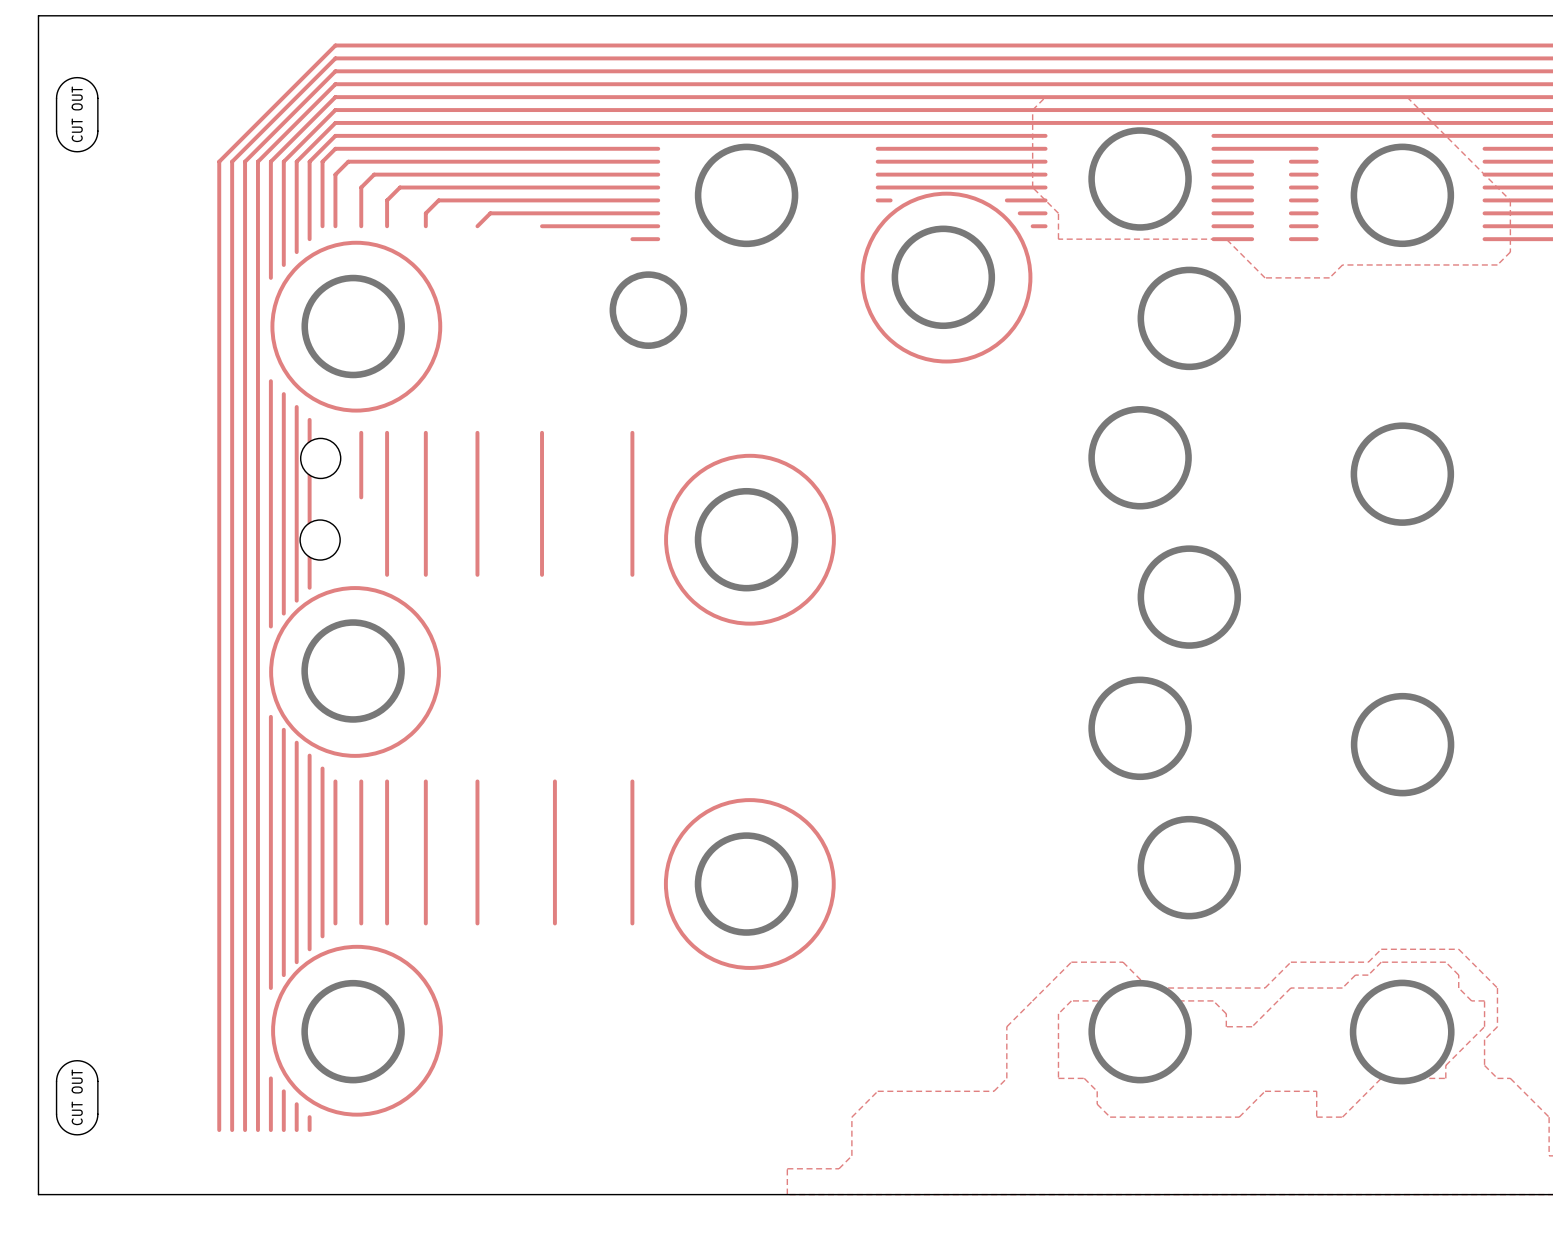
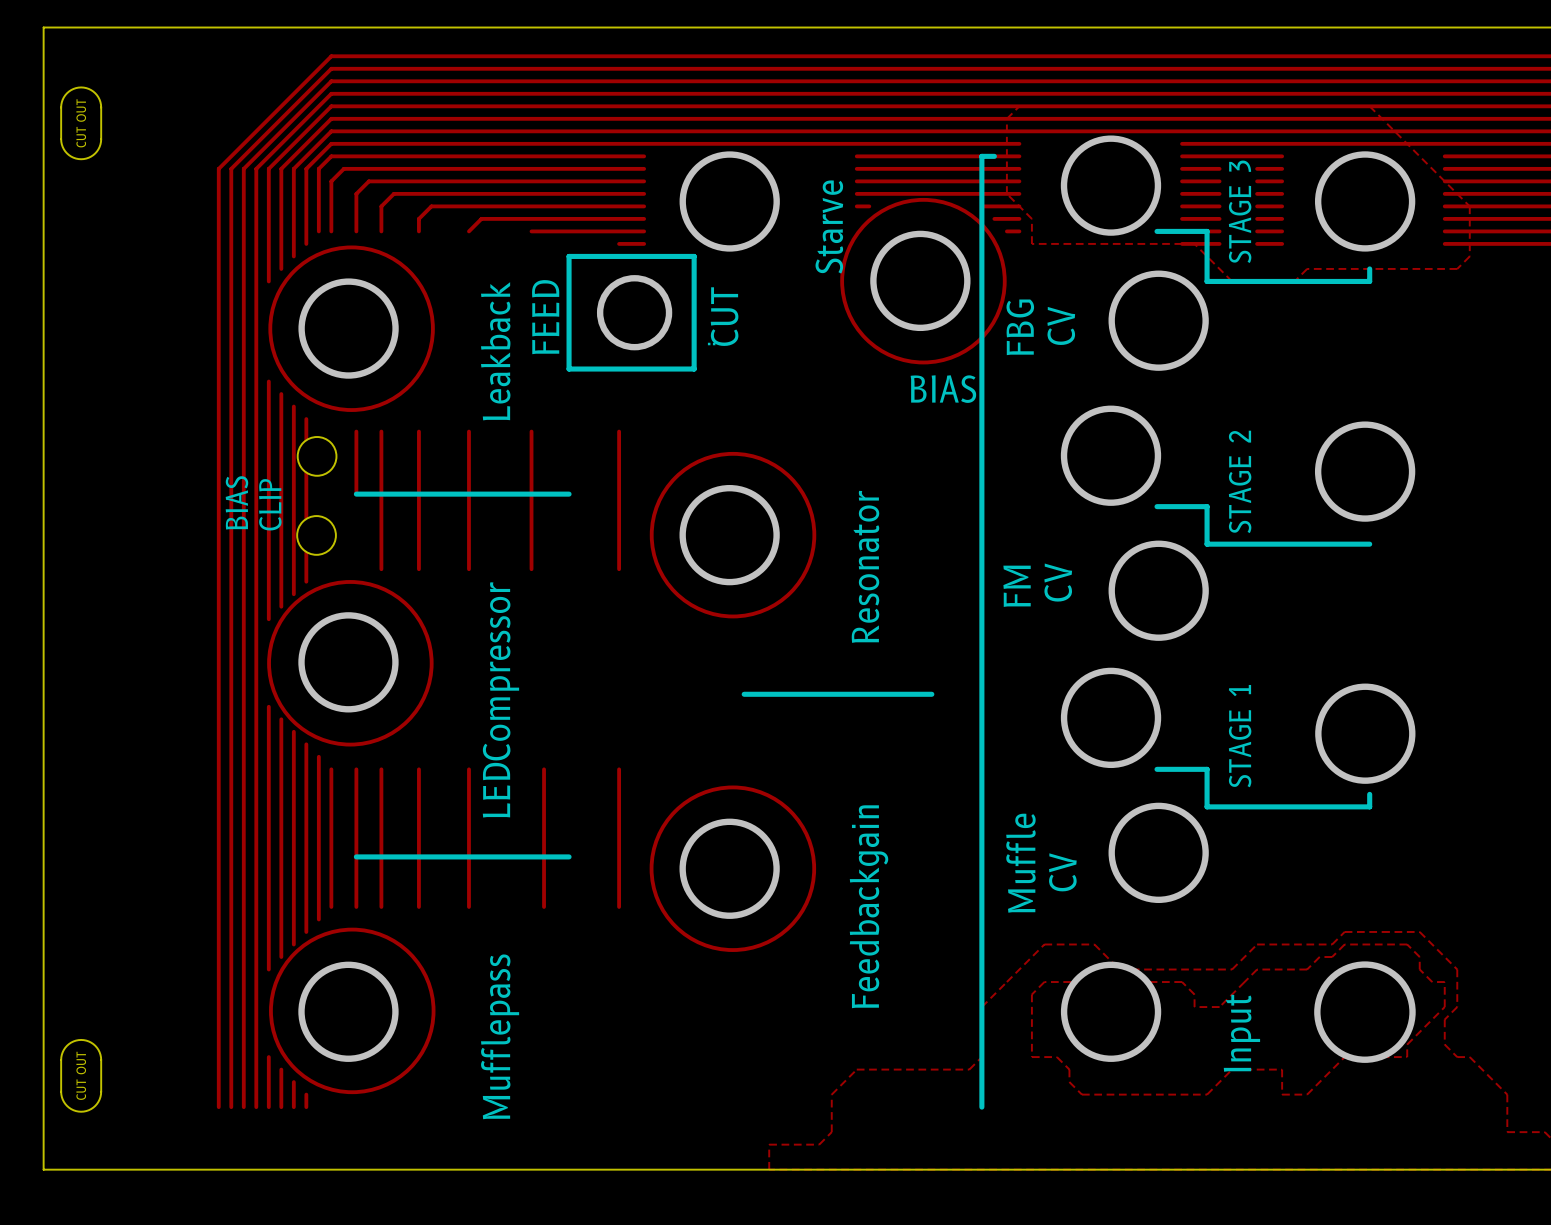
line: none -> (994, 156) (981, 156) (981, 1107)
text: none -> STAGE 3 (1240, 211)
text: none -> Starve (829, 227)
line: none -> (1157, 231) (1207, 231) (1207, 281) (1369, 281) (1369, 268)
line: none -> (569, 256) (569, 369) (694, 369) (694, 256) (569, 256)
text: none -> FEED (545, 317)
text: none -> CUT (724, 316)
text: none -> CV (1061, 325)
text: none -> FBG (1020, 327)
text: none -> Leakback (495, 351)
drawing: none -> [707, 342, 716, 346]
text: none -> BIAS (943, 389)
text: none -> STAGE 2 (1240, 481)
line: none -> (356, 494) (569, 494)
text: none -> BIAS (236, 502)
text: none -> CLIP (270, 504)
line: none -> (1157, 506) (1207, 506) (1207, 544) (1369, 544)
text: none -> Resonator (865, 566)
text: none -> CV (1058, 582)
text: none -> FM (1017, 586)
text: none -> LEDCompressor (500, 699)
line: none -> (744, 694) (931, 694)
text: none -> STAGE 1 (1240, 736)
line: none -> (1157, 769) (1207, 769) (1207, 806) (1369, 806) (1369, 794)
text: none -> CV (1062, 872)
line: none -> (356, 856) (569, 856)
text: none -> Muffle (1020, 863)
text: none -> Feedbackgain (869, 906)
text: none -> Mufflepass (500, 1036)
text: none -> Input (1241, 1033)

